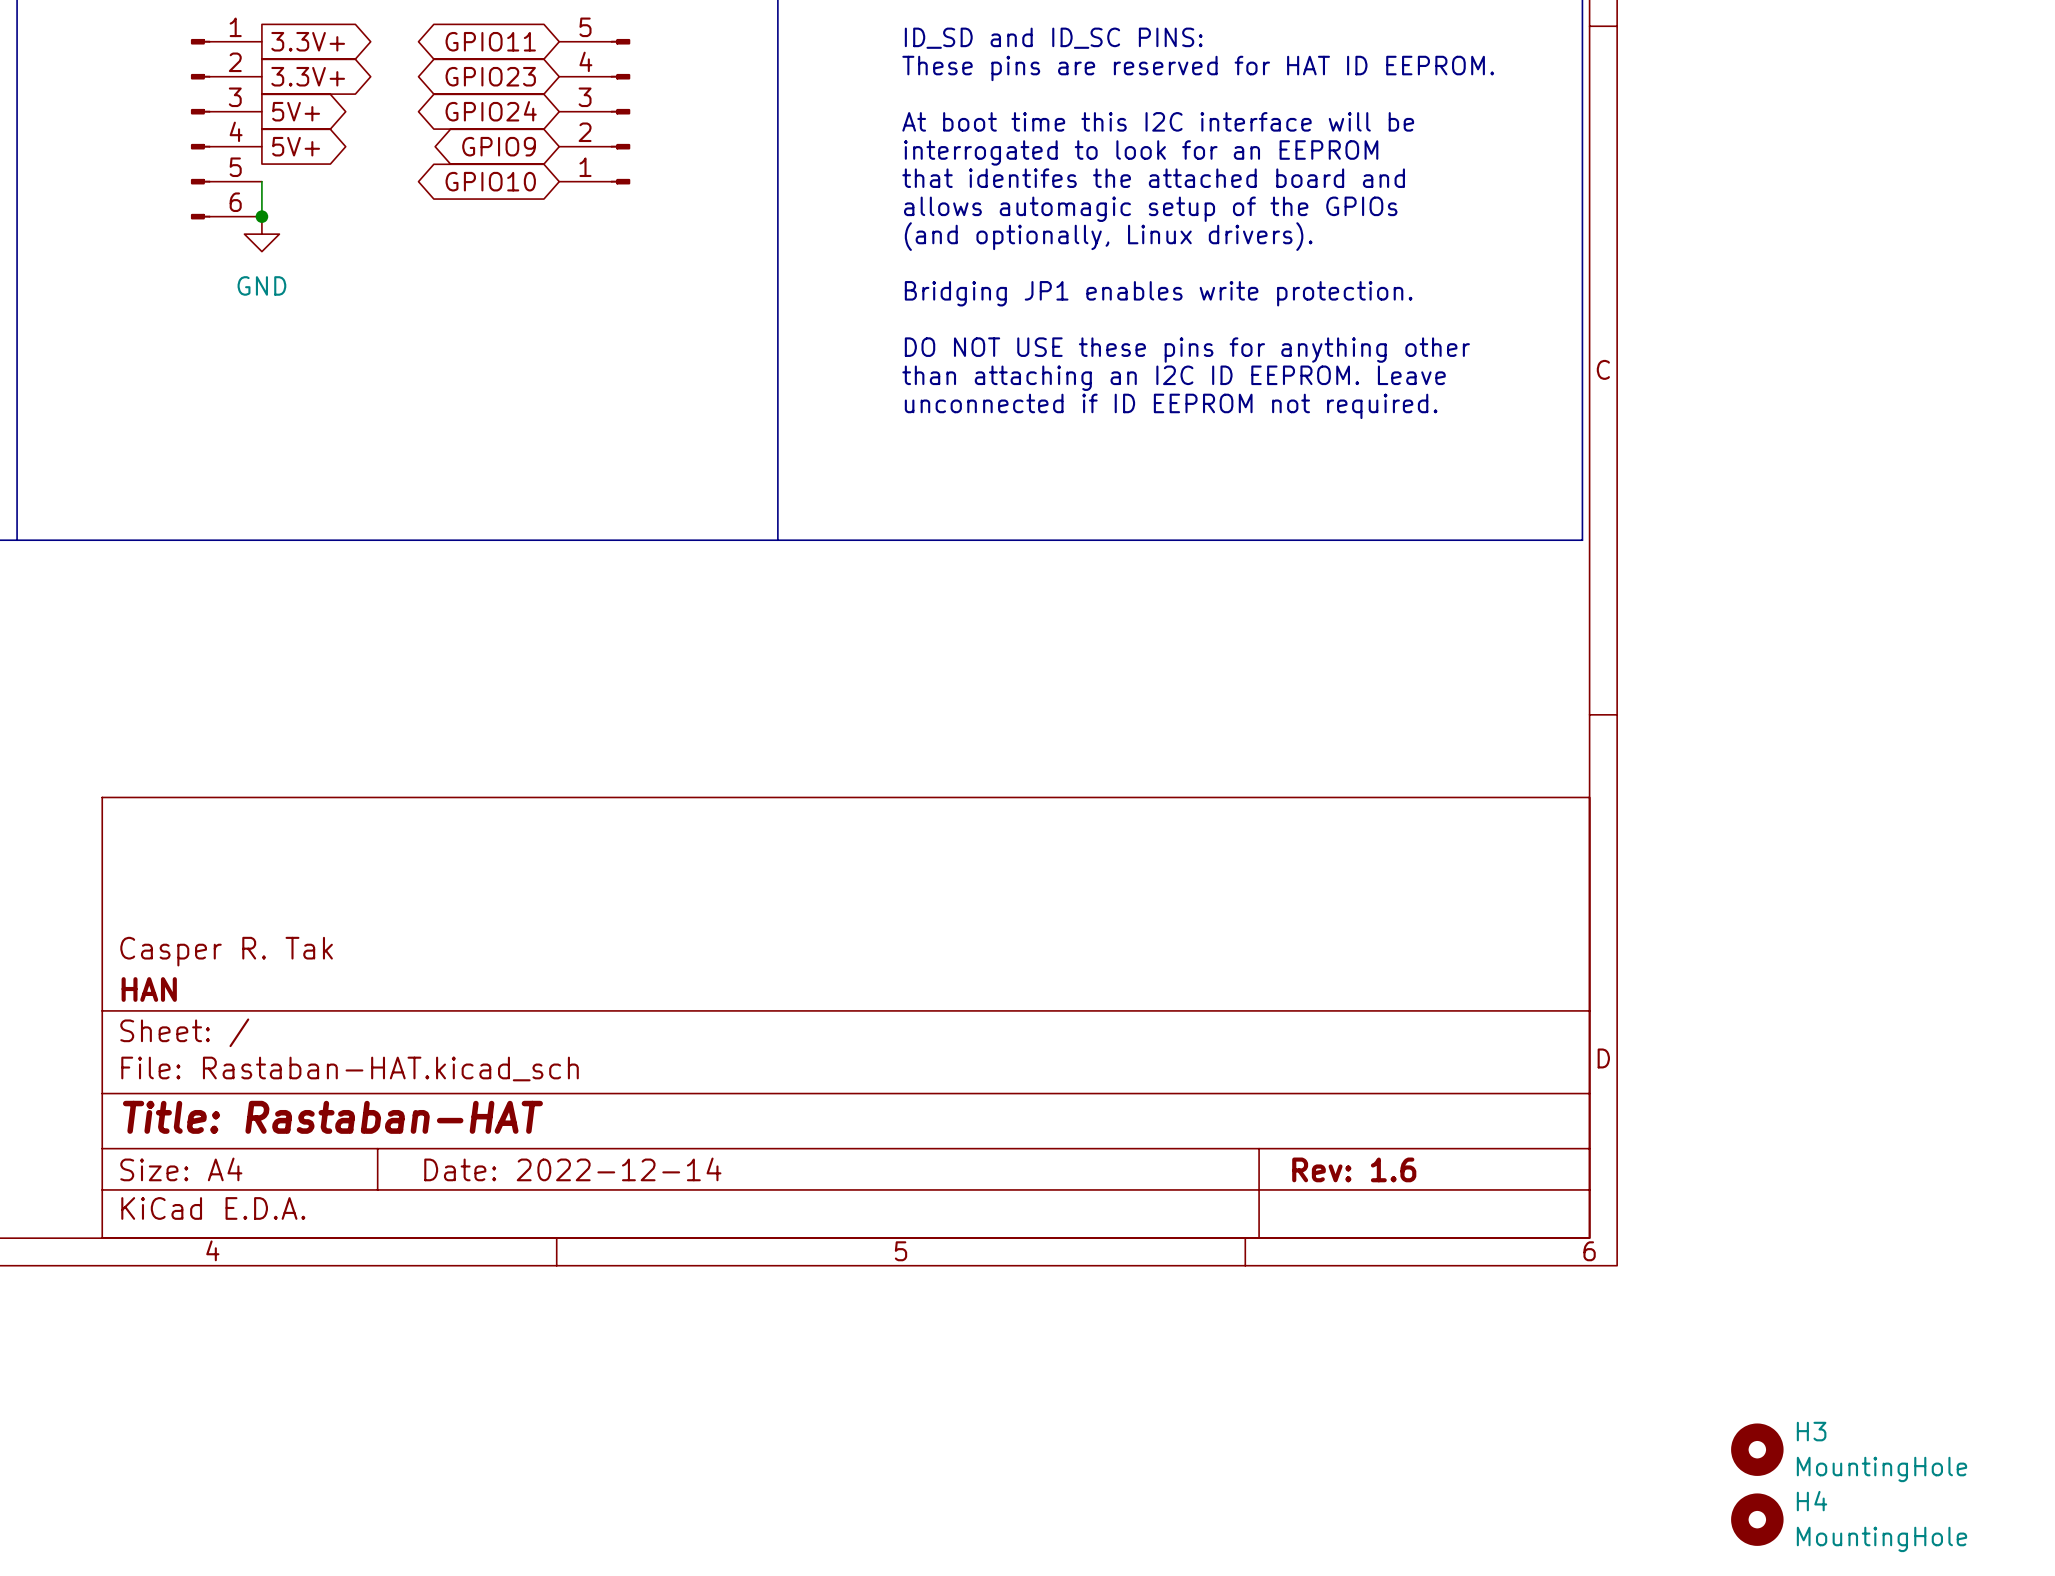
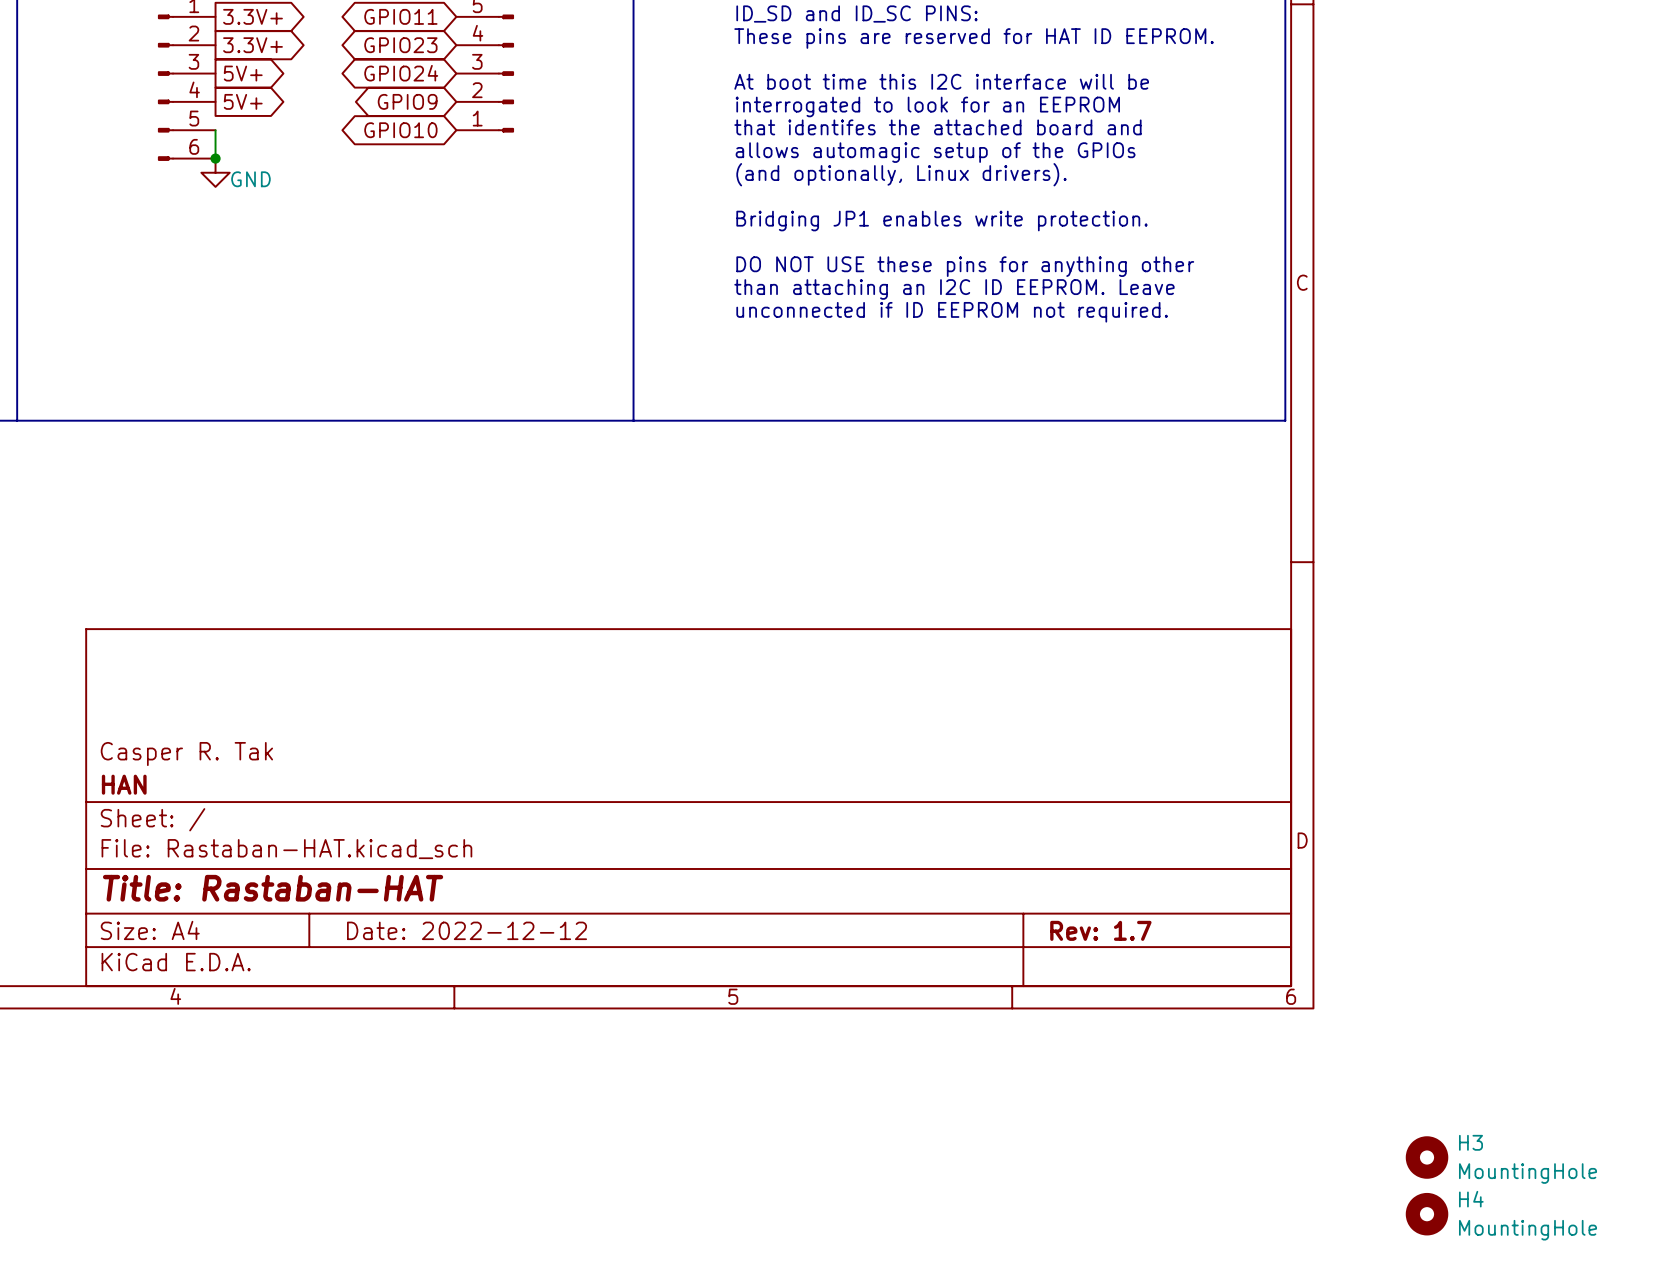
power symbol text position: GND (261, 285) -> GND (250, 179)
title block: Date: 2022-12-14 (572, 1169) -> Date: 2022-12-12 (467, 930)
title block: Rev: 1.6 (1354, 1169) -> Rev: 1.7 (1100, 930)

